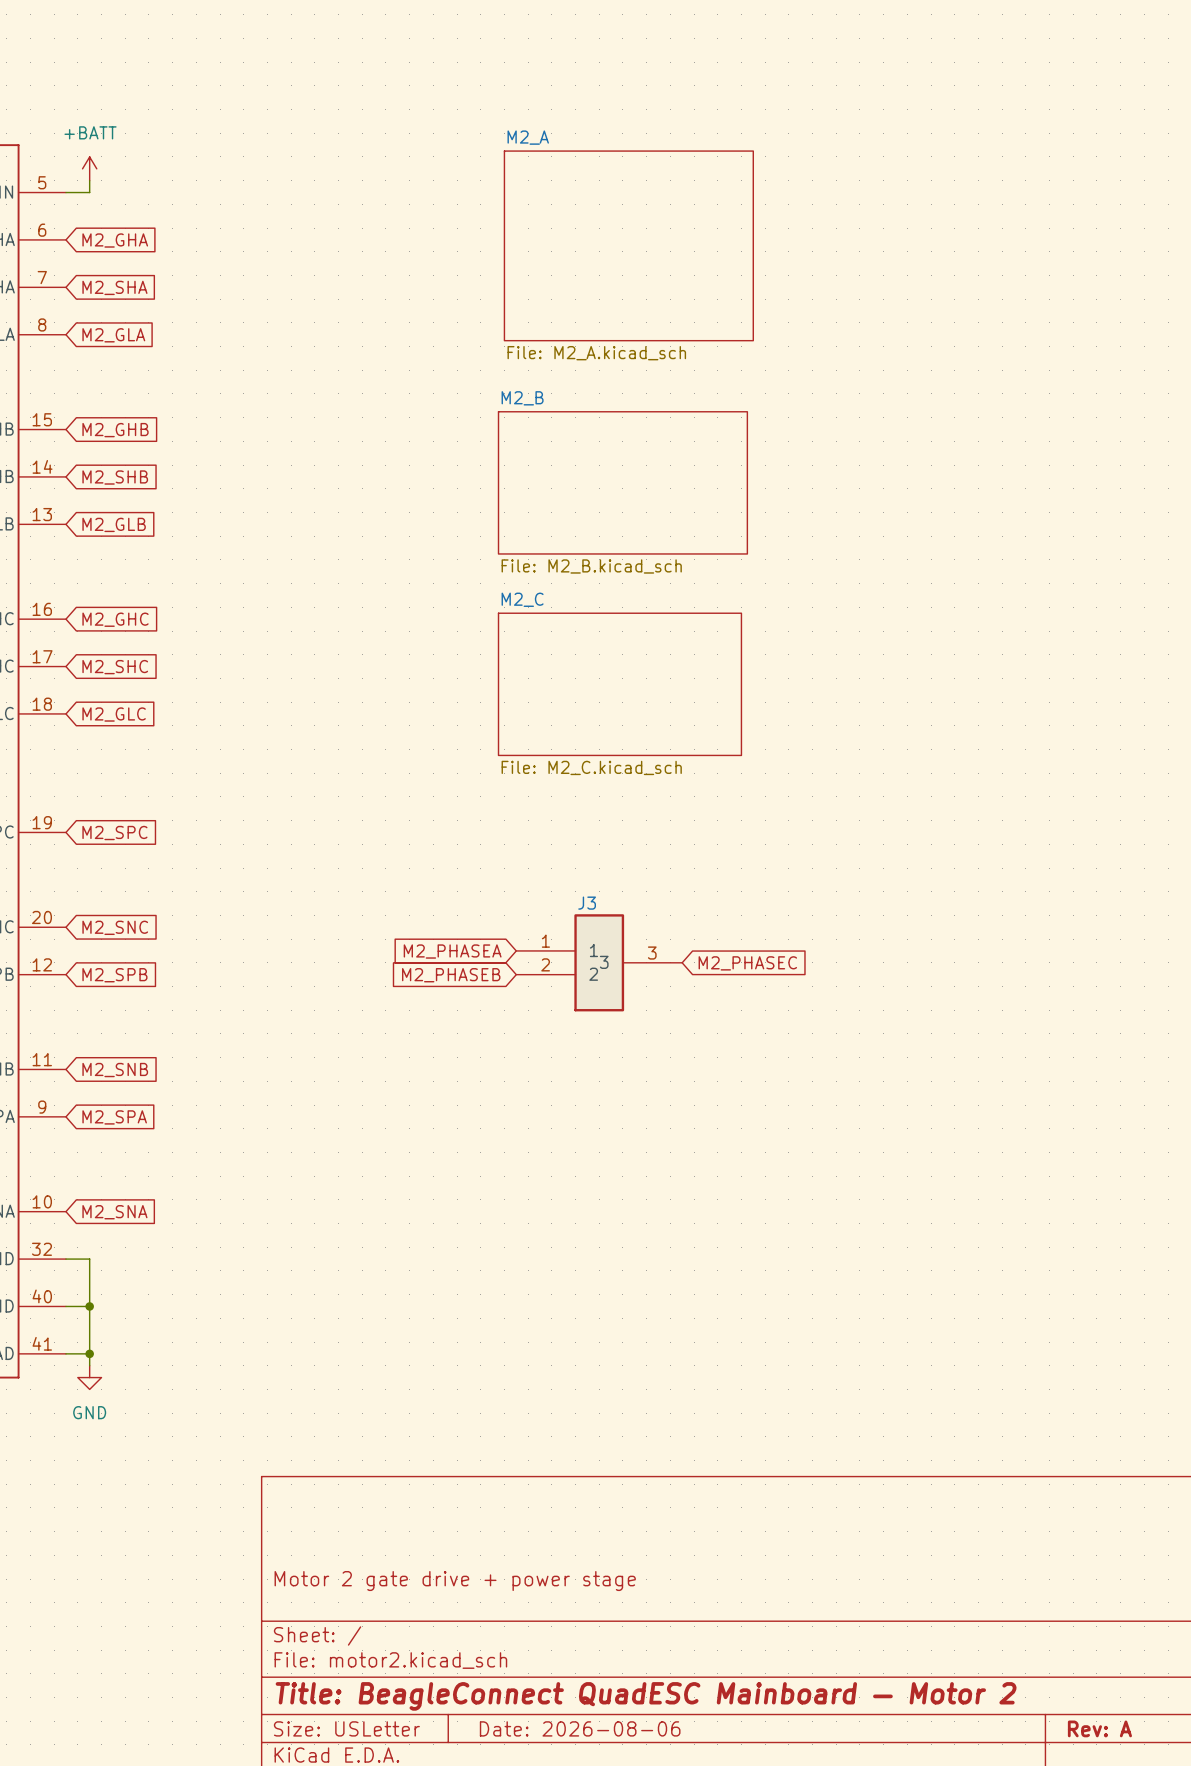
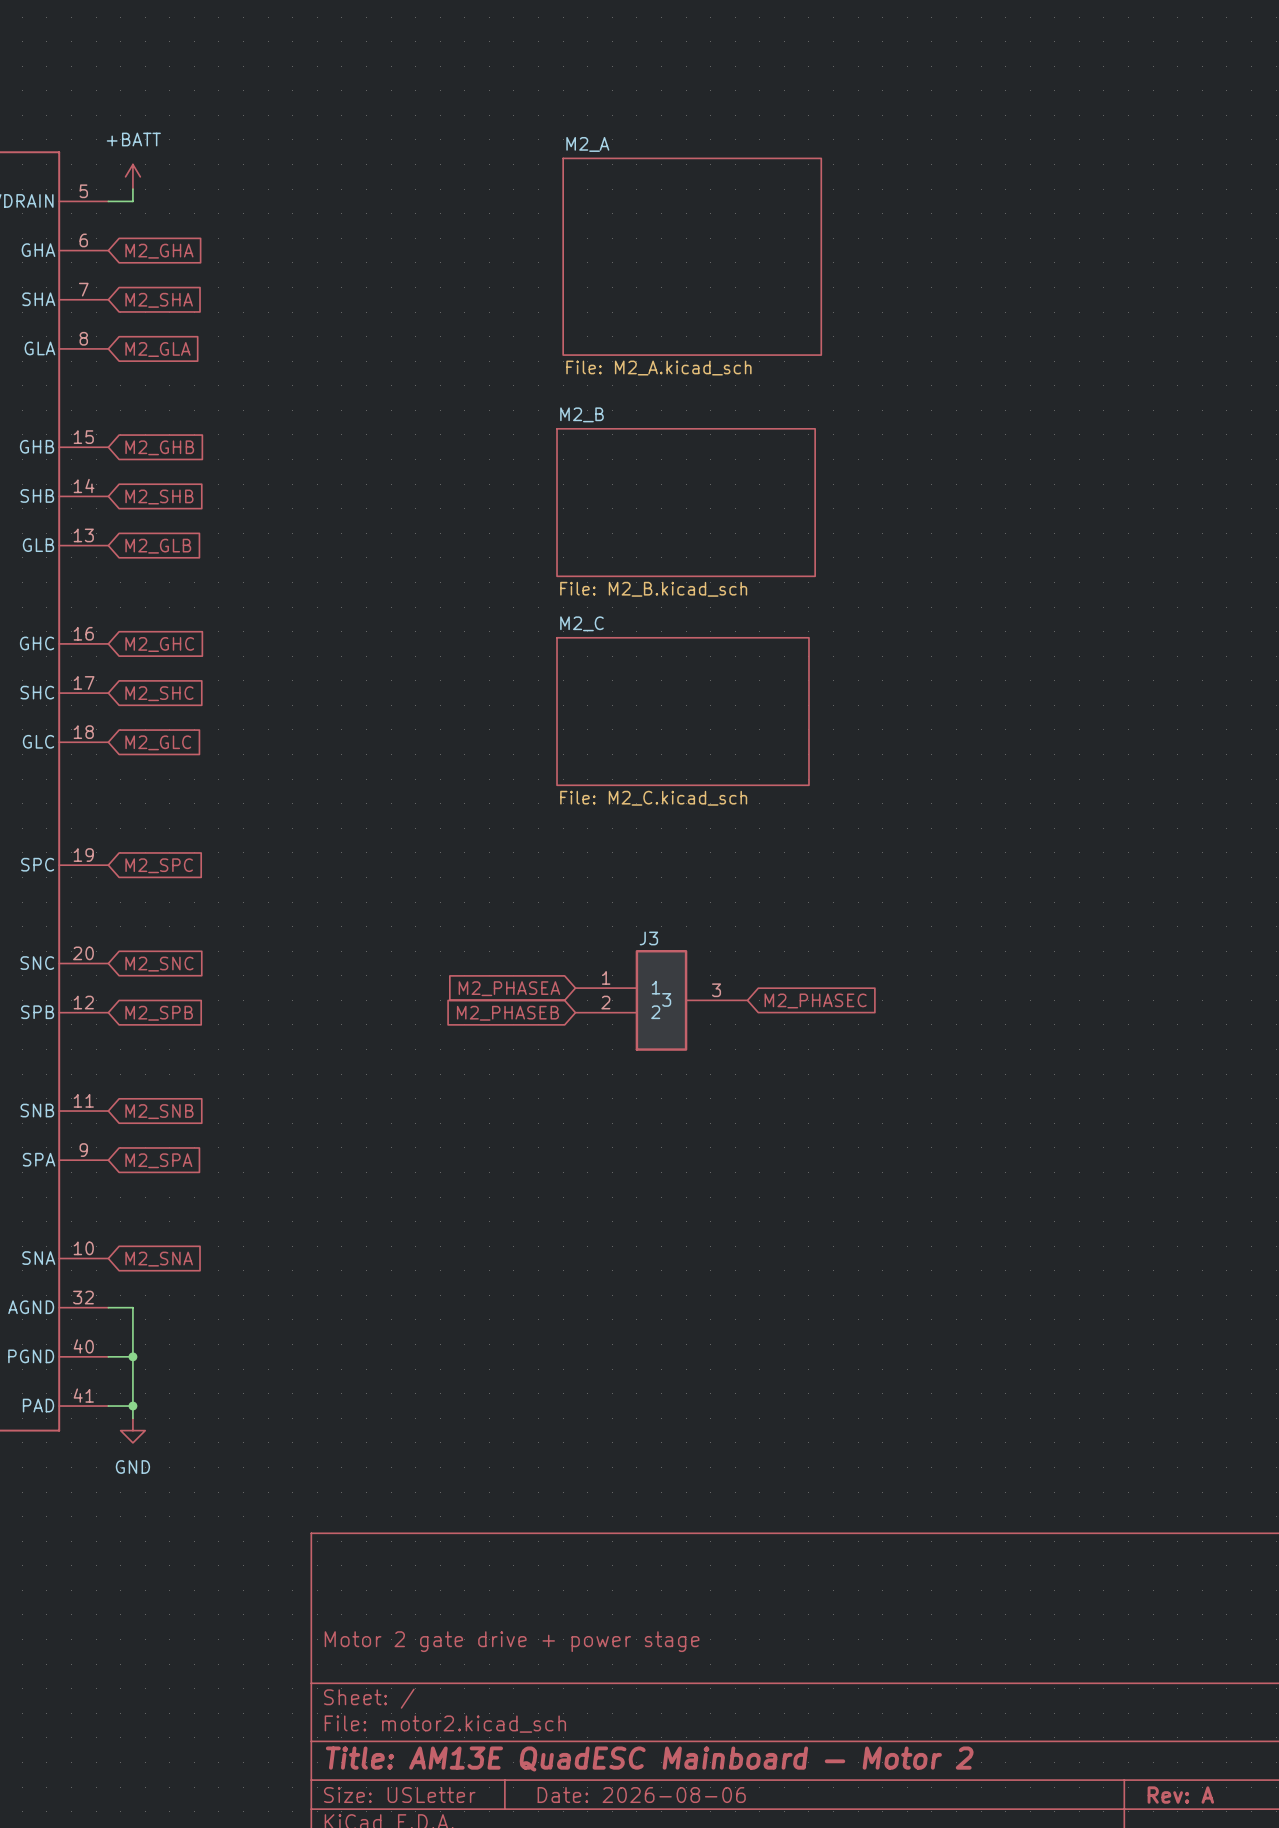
title block: Title: BeagleConnect QuadESC Mainboard — Motor 2 (646, 1696) -> Title: AM13E QuadESC Mainboard — Motor 2 (649, 1759)

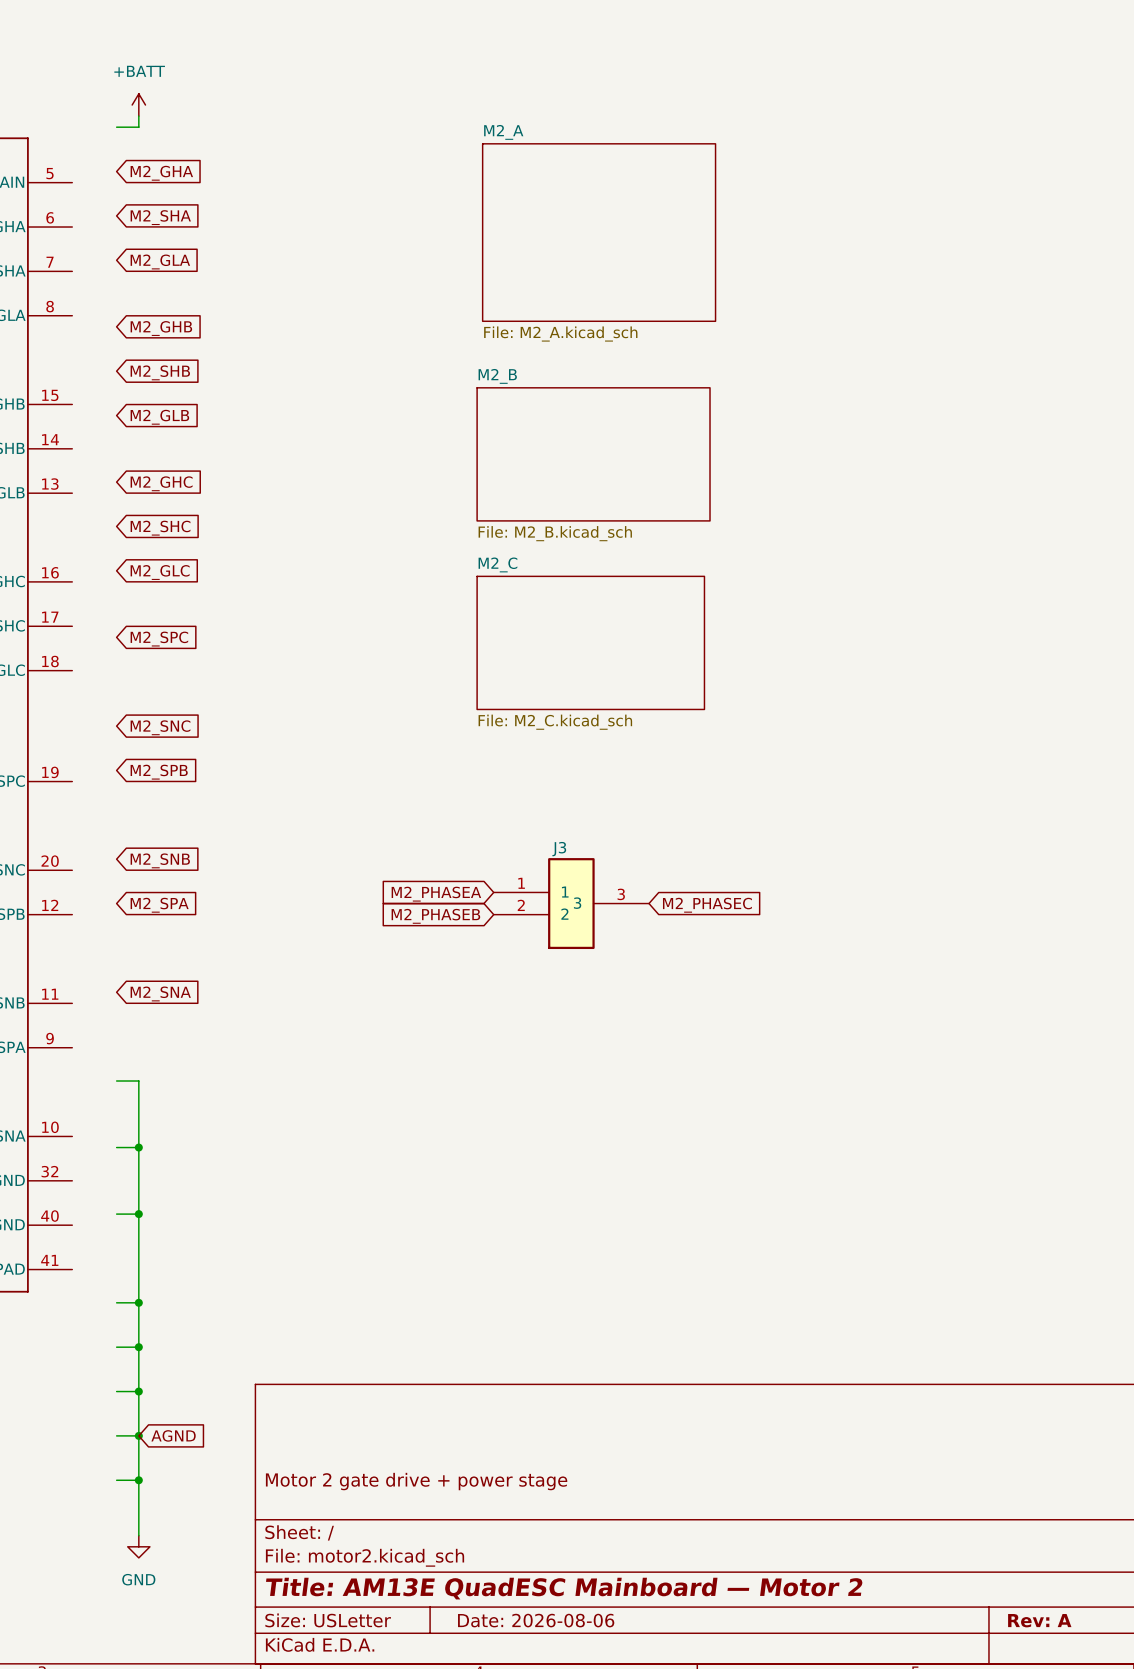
power symbol position: +BATT (132, 176) -> +BATT (138, 105)
wire: (132, 189) (132, 201) (108, 201) -> (138, 116) (138, 127) (116, 127)
global label position: M2_GHA (159, 251) -> M2_GHA (161, 173)
global label position: M2_SHA (159, 300) -> M2_SHA (160, 217)
global label position: M2_GLA (157, 349) -> M2_GLA (160, 261)
global label position: M2_GHB (159, 447) -> M2_GHB (161, 328)
global label position: M2_SHB (159, 497) -> M2_SHB (160, 372)
global label position: M2_GLB (158, 546) -> M2_GLB (159, 417)
global label position: M2_GHC (159, 644) -> M2_GHC (161, 483)
global label position: M2_SHC (159, 693) -> M2_SHC (160, 528)
global label position: M2_GLC (158, 742) -> M2_GLC (160, 572)
global label position: M2_SPC (159, 865) -> M2_SPC (159, 639)
global label position: M2_SNC (159, 964) -> M2_SNC (160, 727)
global label position: M2_SPB (159, 1013) -> M2_SPB (159, 772)
global label position: M2_SNB (159, 1111) -> M2_SNB (160, 860)
global label position: M2_SPA (158, 1160) -> M2_SPA (159, 905)
wire: none -> (116, 1081) (138, 1081) (138, 1535)
global label position: M2_SNA (159, 1259) -> M2_SNA (160, 993)
junction: none -> (138, 1147)
wire: (108, 1307) (132, 1307) (132, 1418) -> none
junction: none -> (138, 1214)
wire: (108, 1356) (132, 1356) -> (116, 1302) (138, 1302)
junction: (132, 1356) -> none
wire: (108, 1406) (132, 1406) -> (116, 1214) (138, 1214)
junction: (132, 1406) -> none
power symbol: GND (132, 1430) -> none
junction: none -> (138, 1302)
wire: none -> (116, 1347) (138, 1347)
junction: none -> (138, 1347)
wire: none -> (116, 1391) (138, 1391)
junction: none -> (138, 1391)
wire: none -> (116, 1435) (138, 1435)
junction: none -> (138, 1435)
global label: none -> AGND (173, 1435)
wire: none -> (116, 1480) (138, 1480)
junction: none -> (138, 1480)
power symbol: none -> GND (138, 1546)

